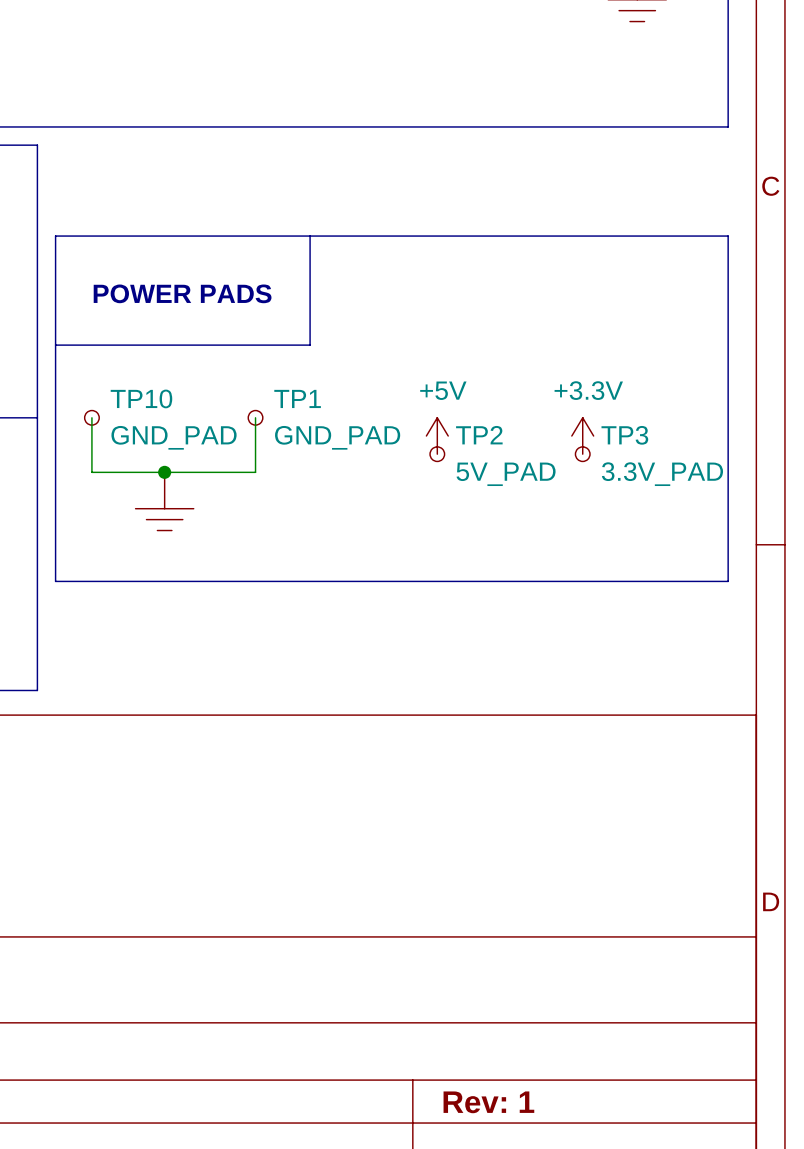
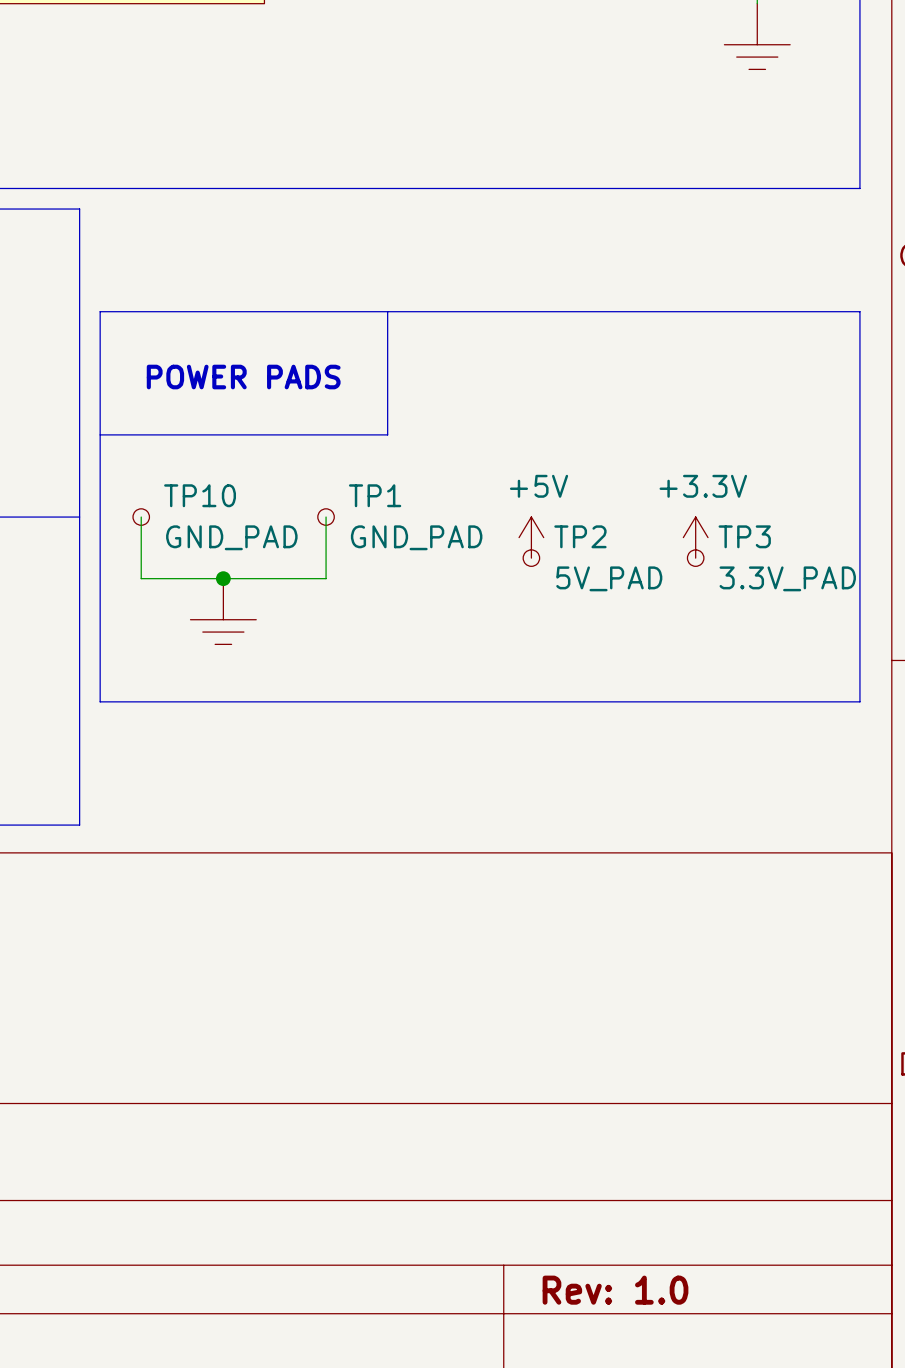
title block: Rev: 1 (488, 1102) -> Rev: 1.0 (615, 1290)

